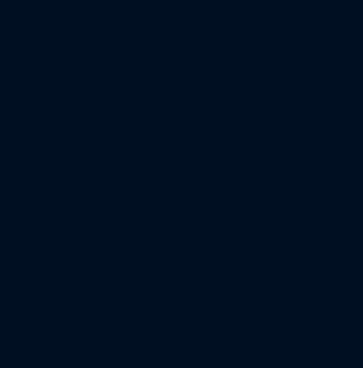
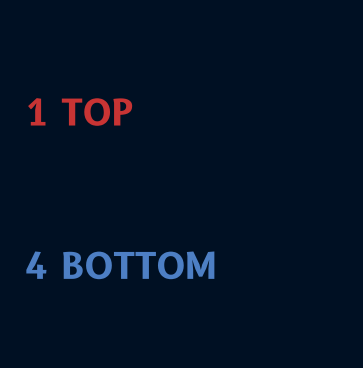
text: none -> 1 TOP (80, 111)
text: none -> 4 BOTTOM (120, 265)

